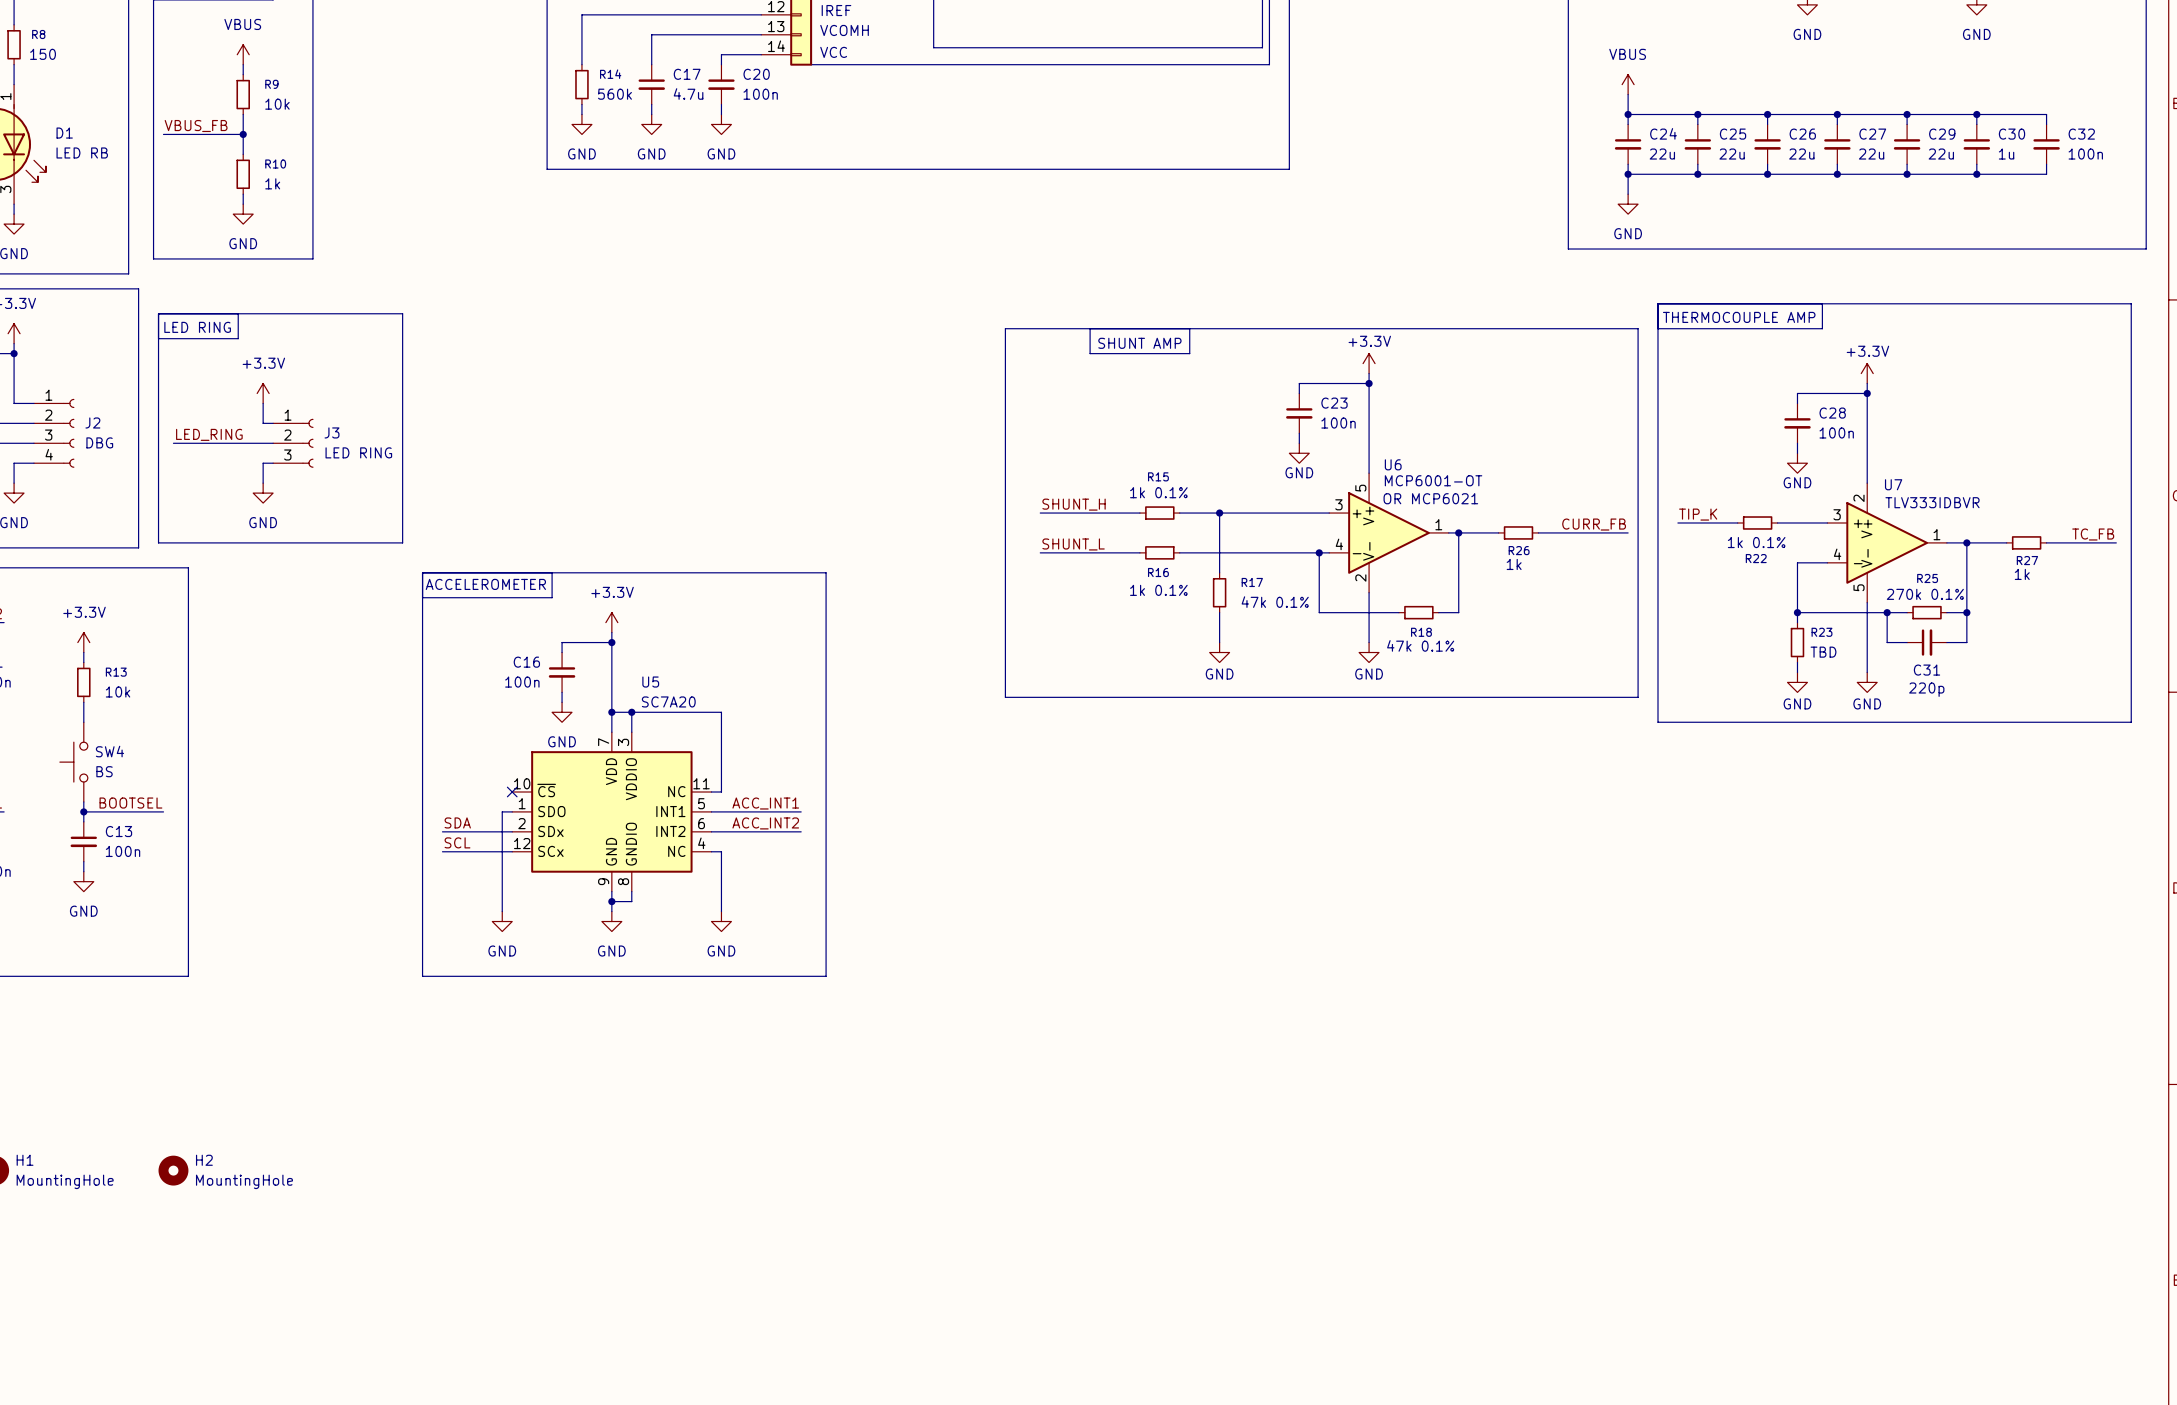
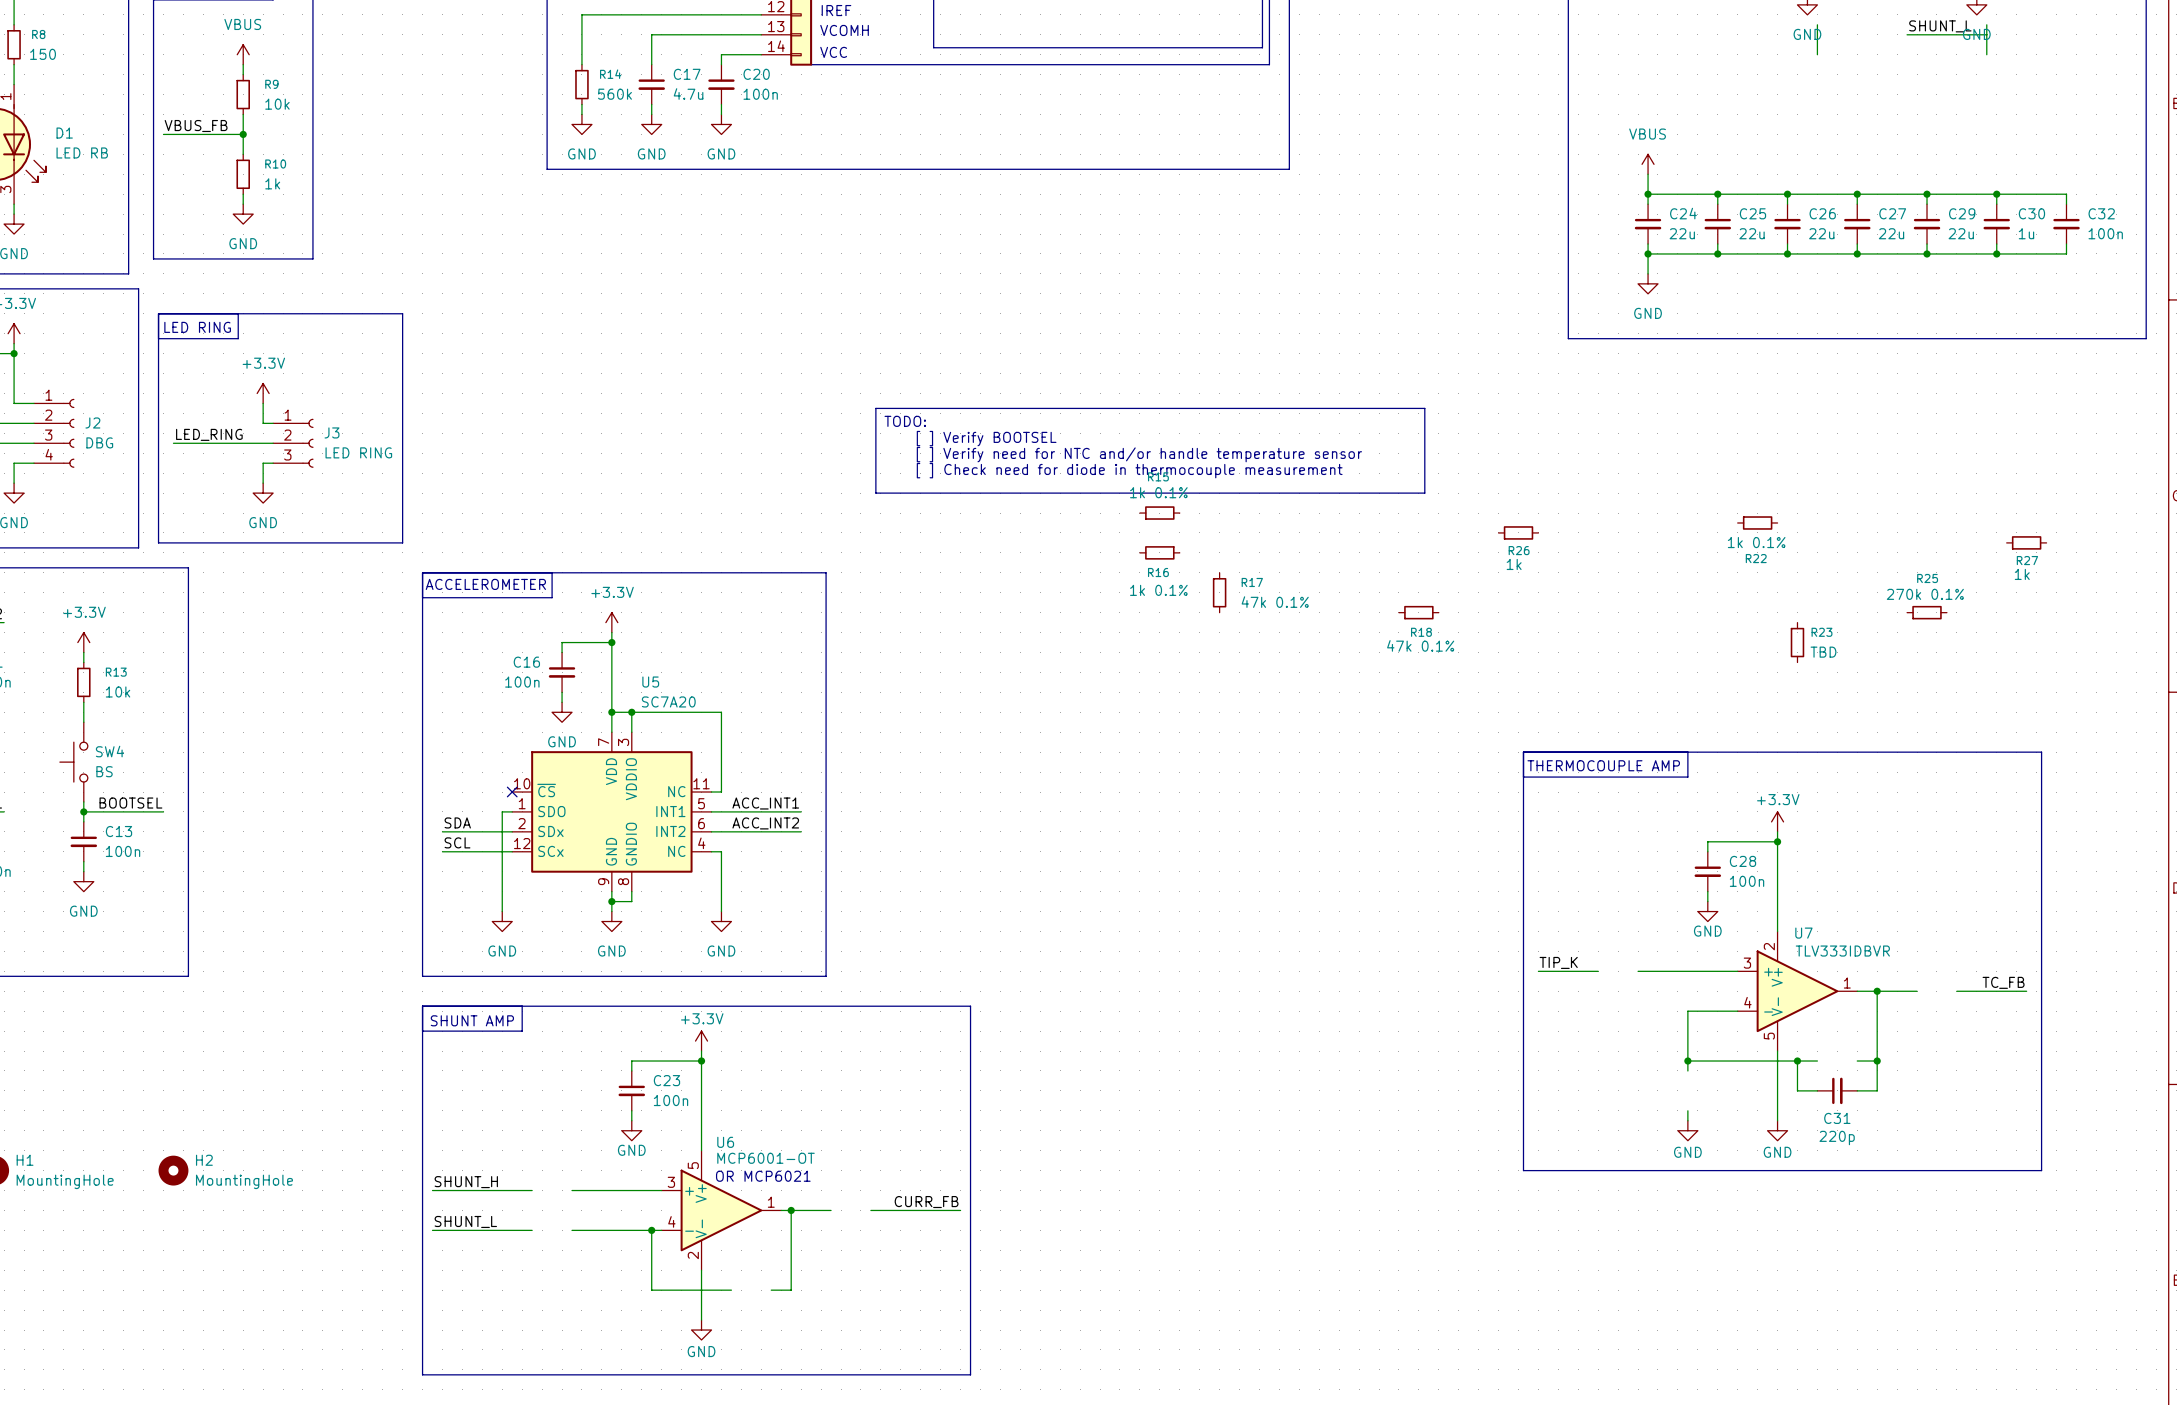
wire: none -> (1817, 24) (1817, 54)
wire: none -> (1986, 24) (1986, 54)
label: none -> SHUNT_L (1940, 26)
wire: none -> (1907, 34) (1986, 34)
power symbol position: VBUS (1628, 84) -> VBUS (1648, 164)
wire: (1628, 94) (1628, 124) -> (1648, 174) (1648, 204)
wire: (1628, 114) (2046, 114) (2046, 124) -> (1648, 194) (2066, 194) (2066, 204)
junction: (1628, 114) -> none
wire: (1697, 114) (1697, 124) -> (1717, 194) (1717, 204)
junction: (1697, 114) -> none
wire: (1767, 114) (1767, 124) -> (1787, 194) (1787, 204)
junction: (1767, 114) -> none
wire: (1837, 114) (1837, 124) -> (1857, 194) (1857, 204)
junction: (1837, 114) -> none
wire: (1907, 114) (1907, 124) -> (1927, 194) (1927, 204)
junction: (1907, 114) -> none
wire: (1976, 114) (1976, 124) -> (1996, 194) (1996, 204)
junction: (1976, 114) -> none
C24 position: (1628, 144) -> (1648, 224)
C25 position: (1697, 144) -> (1717, 224)
C26 position: (1767, 144) -> (1787, 224)
C27 position: (1837, 144) -> (1857, 224)
C29 position: (1907, 144) -> (1927, 224)
C30 position: (1976, 144) -> (1996, 224)
C32 position: (2046, 144) -> (2066, 224)
wire: (1628, 164) (1628, 194) -> (1648, 244) (1648, 273)
wire: (1697, 164) (1697, 174) -> (1717, 244) (1717, 253)
wire: (1767, 164) (1767, 174) -> (1787, 244) (1787, 253)
wire: (1837, 164) (1837, 174) -> (1857, 244) (1857, 253)
wire: (1907, 164) (1907, 174) -> (1927, 244) (1927, 253)
wire: (1976, 164) (1976, 174) -> (1996, 244) (1996, 253)
wire: (2046, 164) (2046, 174) (1628, 174) -> (2066, 244) (2066, 253) (1648, 253)
junction: (1628, 174) -> none
junction: (1697, 174) -> none
junction: (1767, 174) -> none
junction: (1837, 174) -> none
junction: (1907, 174) -> none
junction: (1976, 174) -> none
junction: none -> (1648, 194)
junction: none -> (1717, 194)
junction: none -> (1787, 194)
junction: none -> (1857, 194)
junction: none -> (1927, 194)
junction: none -> (1996, 194)
power symbol position: GND (1628, 204) -> GND (1648, 283)
line: (1568, 249) (2146, 249) -> (1568, 249) (1568, 338) (2146, 338) (2146, 249)
junction: none -> (1648, 253)
junction: none -> (1717, 253)
junction: none -> (1787, 253)
junction: none -> (1857, 253)
junction: none -> (1927, 253)
junction: none -> (1996, 253)
line: (1657, 303) (2131, 303) (2131, 722) (1657, 722) (1657, 303) -> none
line: (1822, 303) (1822, 328) (1657, 328) -> none
text: THERMOCOUPLE AMP (1739, 317) -> none
line: (1005, 328) (1638, 328) (1638, 697) (1005, 697) (1005, 328) -> none
line: (1090, 328) (1090, 353) (1189, 353) (1189, 328) -> none
text: SHUNT AMP (1139, 343) -> none
power symbol: +3.3V (1369, 363) -> none
wire: (1369, 373) (1369, 473) -> none
power symbol: +3.3V (1867, 373) -> none
wire: (1369, 383) (1299, 383) (1299, 393) -> none
junction: (1369, 383) -> none
wire: (1867, 383) (1867, 483) -> none
wire: (1867, 393) (1797, 393) (1797, 403) -> none
junction: (1867, 393) -> none
line: none -> (875, 408) (1424, 408) (1424, 493) (875, 493) (875, 408)
C23 position: (1299, 413) -> (631, 1090)
text: none -> TODO: (905, 421)
C28 position: (1797, 423) -> (1707, 871)
wire: (1299, 433) (1299, 443) -> none
text: none -> [ ] Verify BOOTSEL (986, 438)
wire: (1797, 443) (1797, 453) -> none
power symbol: GND (1299, 453) -> none
text: none -> [ ] Verify need for NTC and/or handle temperature sensor (1139, 454)
power symbol: GND (1797, 463) -> none
text: none -> [ ] Check need for diode in thermocouple measurement (1129, 470)
text: OR MCP6021 (1430, 498) -> none
label: SHUNT_H (1074, 504) -> none
wire: (1040, 513) (1139, 513) -> none
wire: (1179, 513) (1329, 513) -> none
wire: (1219, 513) (1219, 572) -> none
junction: (1219, 513) -> none
label: TIP_K (1698, 514) -> none
wire: (1677, 522) (1737, 522) -> none
wire: (1777, 522) (1827, 522) -> none
label: CURR_FB (1594, 524) -> none
U6 position: (1388, 532) -> (721, 1210)
wire: (1448, 532) (1498, 532) -> none
wire: (1458, 532) (1458, 612) (1438, 612) -> none
junction: (1458, 532) -> none
wire: (1538, 532) (1628, 532) -> none
label: TC_FB (2093, 534) -> none
U7 position: (1887, 542) -> (1797, 991)
wire: (1946, 542) (2006, 542) -> none
wire: (1966, 542) (1966, 642) (1946, 642) -> none
junction: (1966, 542) -> none
wire: (2046, 542) (2116, 542) -> none
label: SHUNT_L (1073, 544) -> none
wire: (1040, 552) (1139, 552) -> none
wire: (1179, 552) (1329, 552) -> none
wire: (1319, 552) (1319, 612) (1398, 612) -> none
junction: (1319, 552) -> none
wire: (1827, 562) (1797, 562) (1797, 622) -> none
wire: (1369, 592) (1369, 642) -> none
wire: (1867, 602) (1867, 672) -> none
wire: (1219, 612) (1219, 642) -> none
wire: (1797, 612) (1907, 612) -> none
junction: (1797, 612) -> none
wire: (1887, 612) (1887, 642) (1907, 642) -> none
junction: (1887, 612) -> none
wire: (1946, 612) (1966, 612) -> none
junction: (1966, 612) -> none
C31 position: (1927, 642) -> (1837, 1090)
power symbol: GND (1219, 652) -> none
power symbol: GND (1369, 652) -> none
wire: (1797, 662) (1797, 672) -> none
power symbol: GND (1797, 682) -> none
power symbol: GND (1867, 682) -> none
line: none -> (1523, 752) (2041, 752) (2041, 1170) (1523, 1170) (1523, 752)
line: none -> (1687, 752) (1687, 777) (1523, 777)
text: none -> THERMOCOUPLE AMP (1603, 765)
power symbol: none -> +3.3V (1777, 821)
wire: none -> (1777, 831) (1777, 931)
wire: none -> (1777, 841) (1707, 841) (1707, 851)
junction: none -> (1777, 841)
wire: none -> (1707, 891) (1707, 901)
power symbol: none -> GND (1707, 911)
label: none -> TIP_K (1558, 962)
wire: none -> (1538, 971) (1598, 971)
wire: none -> (1638, 971) (1737, 971)
label: none -> TC_FB (2003, 982)
wire: none -> (1857, 991) (1917, 991)
wire: none -> (1877, 991) (1877, 1090) (1857, 1090)
junction: none -> (1877, 991)
wire: none -> (1956, 991) (2026, 991)
line: none -> (422, 1006) (970, 1006) (970, 1374) (422, 1374) (422, 1006)
line: none -> (522, 1006) (522, 1031) (422, 1031)
wire: none -> (1737, 1011) (1687, 1011) (1687, 1070)
text: none -> SHUNT AMP (472, 1020)
power symbol: none -> +3.3V (701, 1041)
wire: none -> (701, 1051) (701, 1150)
wire: none -> (1777, 1051) (1777, 1120)
wire: none -> (701, 1061) (631, 1061) (631, 1070)
junction: none -> (701, 1061)
wire: none -> (1687, 1061) (1817, 1061)
junction: none -> (1687, 1061)
wire: none -> (1797, 1061) (1797, 1090) (1817, 1090)
junction: none -> (1797, 1061)
wire: none -> (1857, 1061) (1877, 1061)
junction: none -> (1877, 1061)
wire: none -> (631, 1110) (631, 1120)
wire: none -> (1687, 1110) (1687, 1120)
power symbol: none -> GND (631, 1130)
power symbol: none -> GND (1687, 1130)
power symbol: none -> GND (1777, 1130)
text: none -> OR MCP6021 (763, 1176)
label: none -> SHUNT_H (466, 1182)
wire: none -> (432, 1190) (532, 1190)
wire: none -> (572, 1190) (661, 1190)
label: none -> CURR_FB (926, 1202)
wire: none -> (781, 1210) (831, 1210)
wire: none -> (791, 1210) (791, 1290) (771, 1290)
junction: none -> (791, 1210)
wire: none -> (870, 1210) (960, 1210)
label: none -> SHUNT_L (465, 1221)
wire: none -> (432, 1230) (532, 1230)
wire: none -> (572, 1230) (661, 1230)
wire: none -> (651, 1230) (651, 1290) (731, 1290)
junction: none -> (651, 1230)
wire: none -> (701, 1270) (701, 1320)
power symbol: none -> GND (701, 1330)

